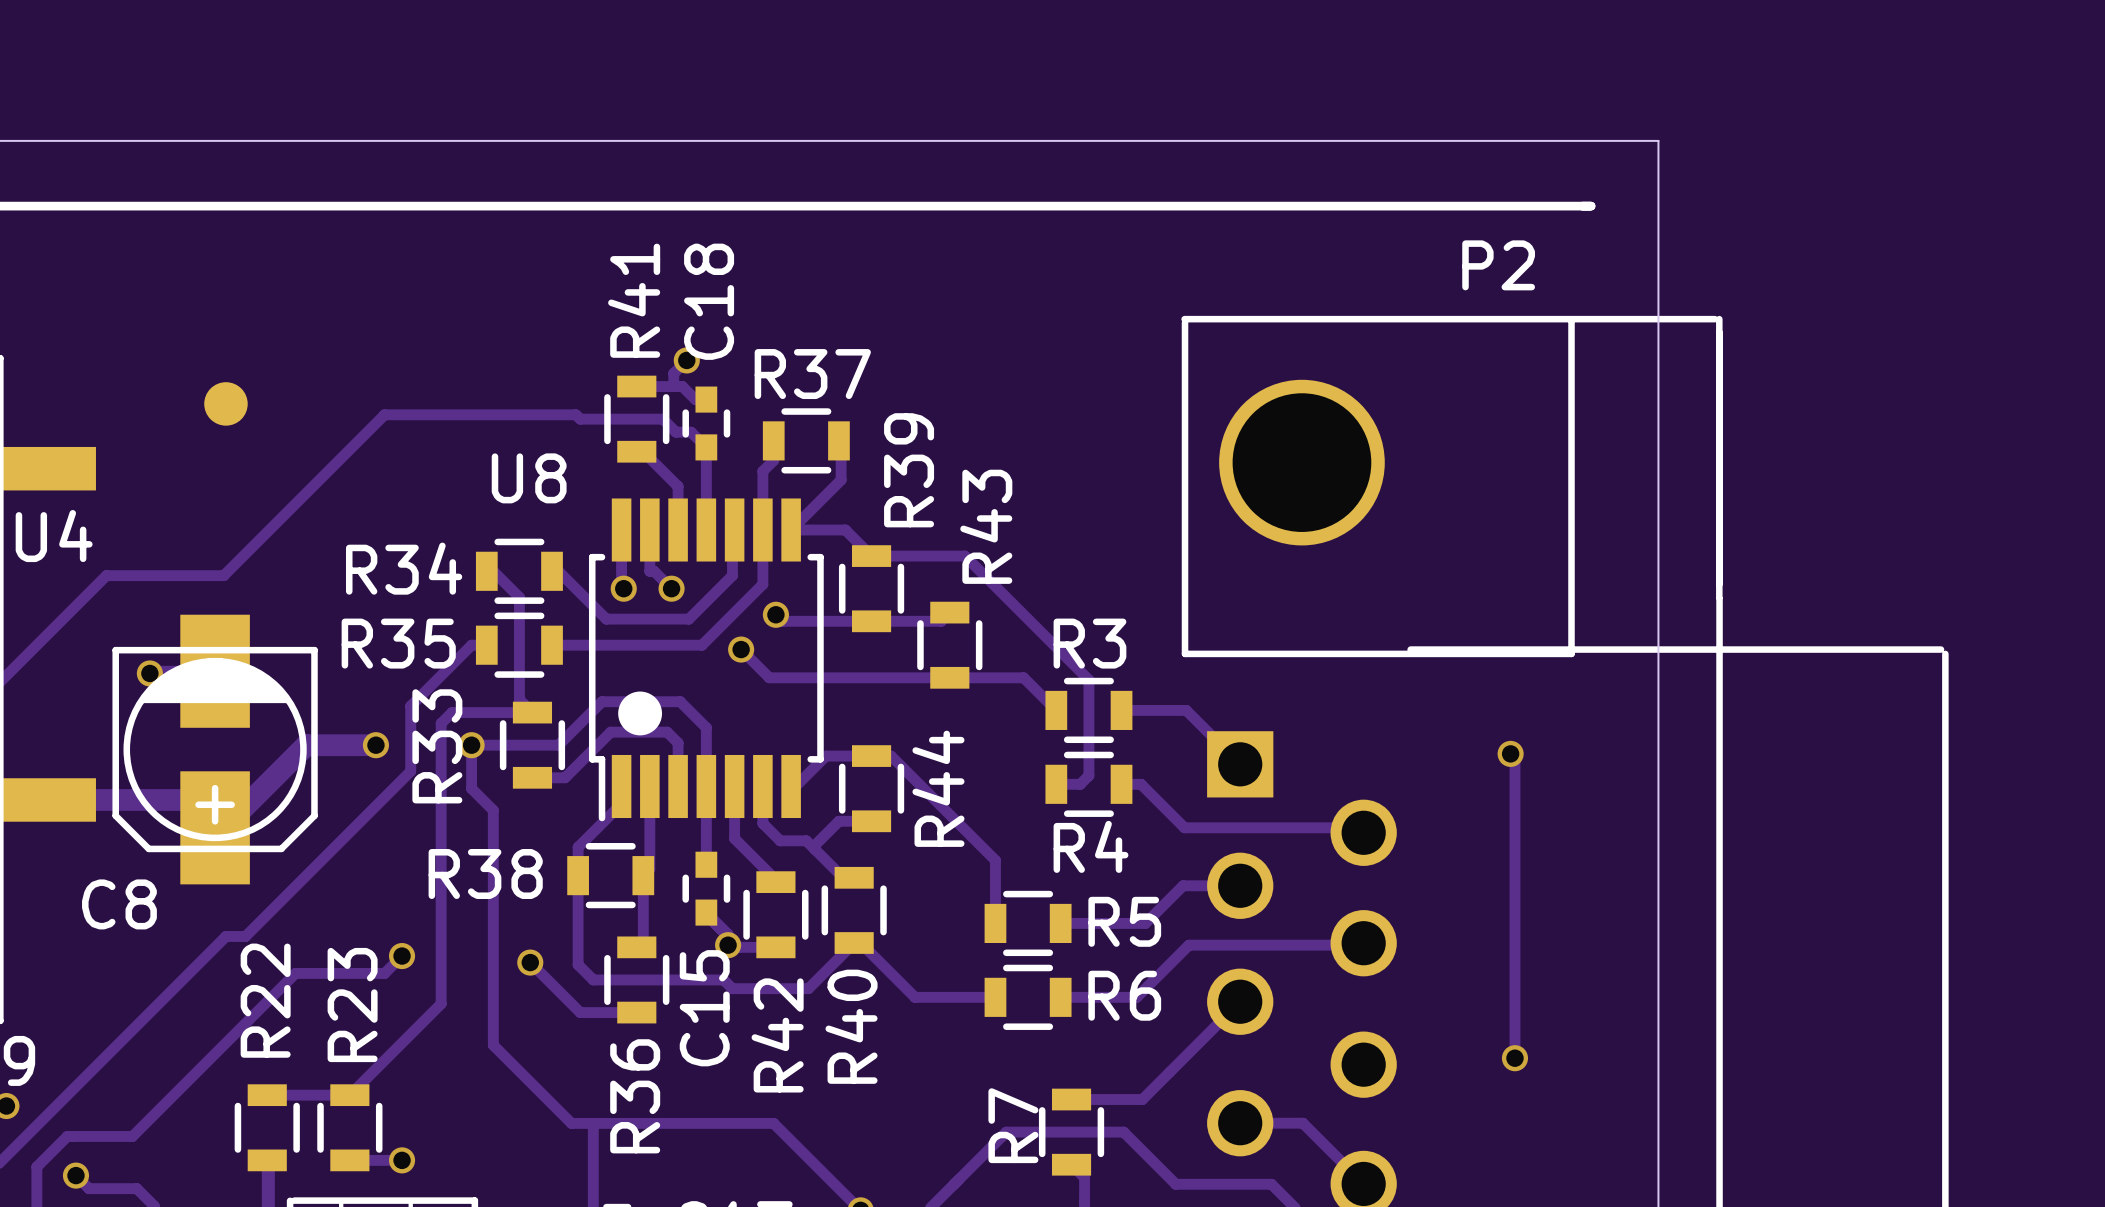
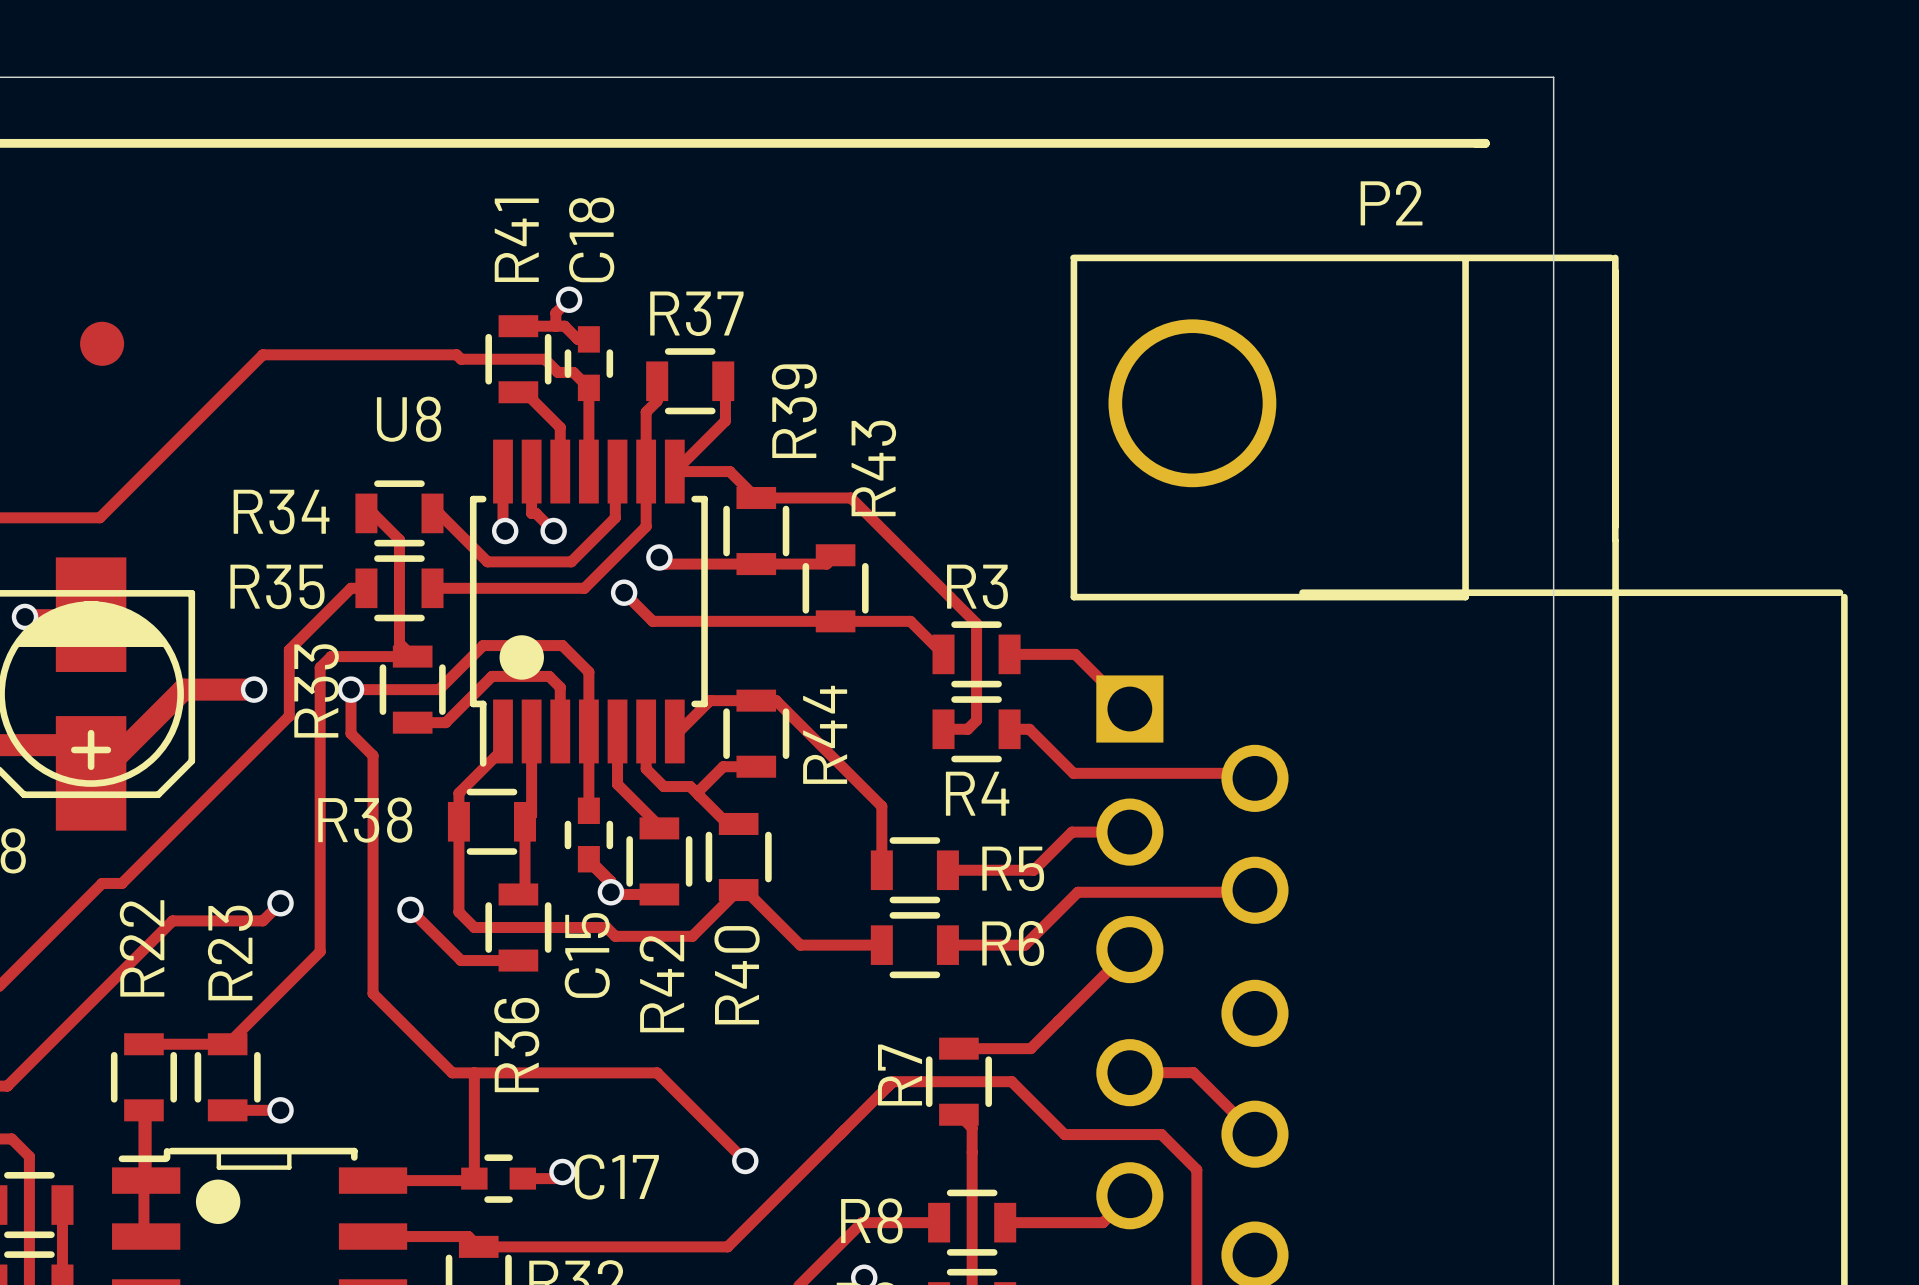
track: (1510, 753) (1514, 758) (1514, 1058) -> none
via: (1510, 753) -> none
via: (1514, 1058) -> none

